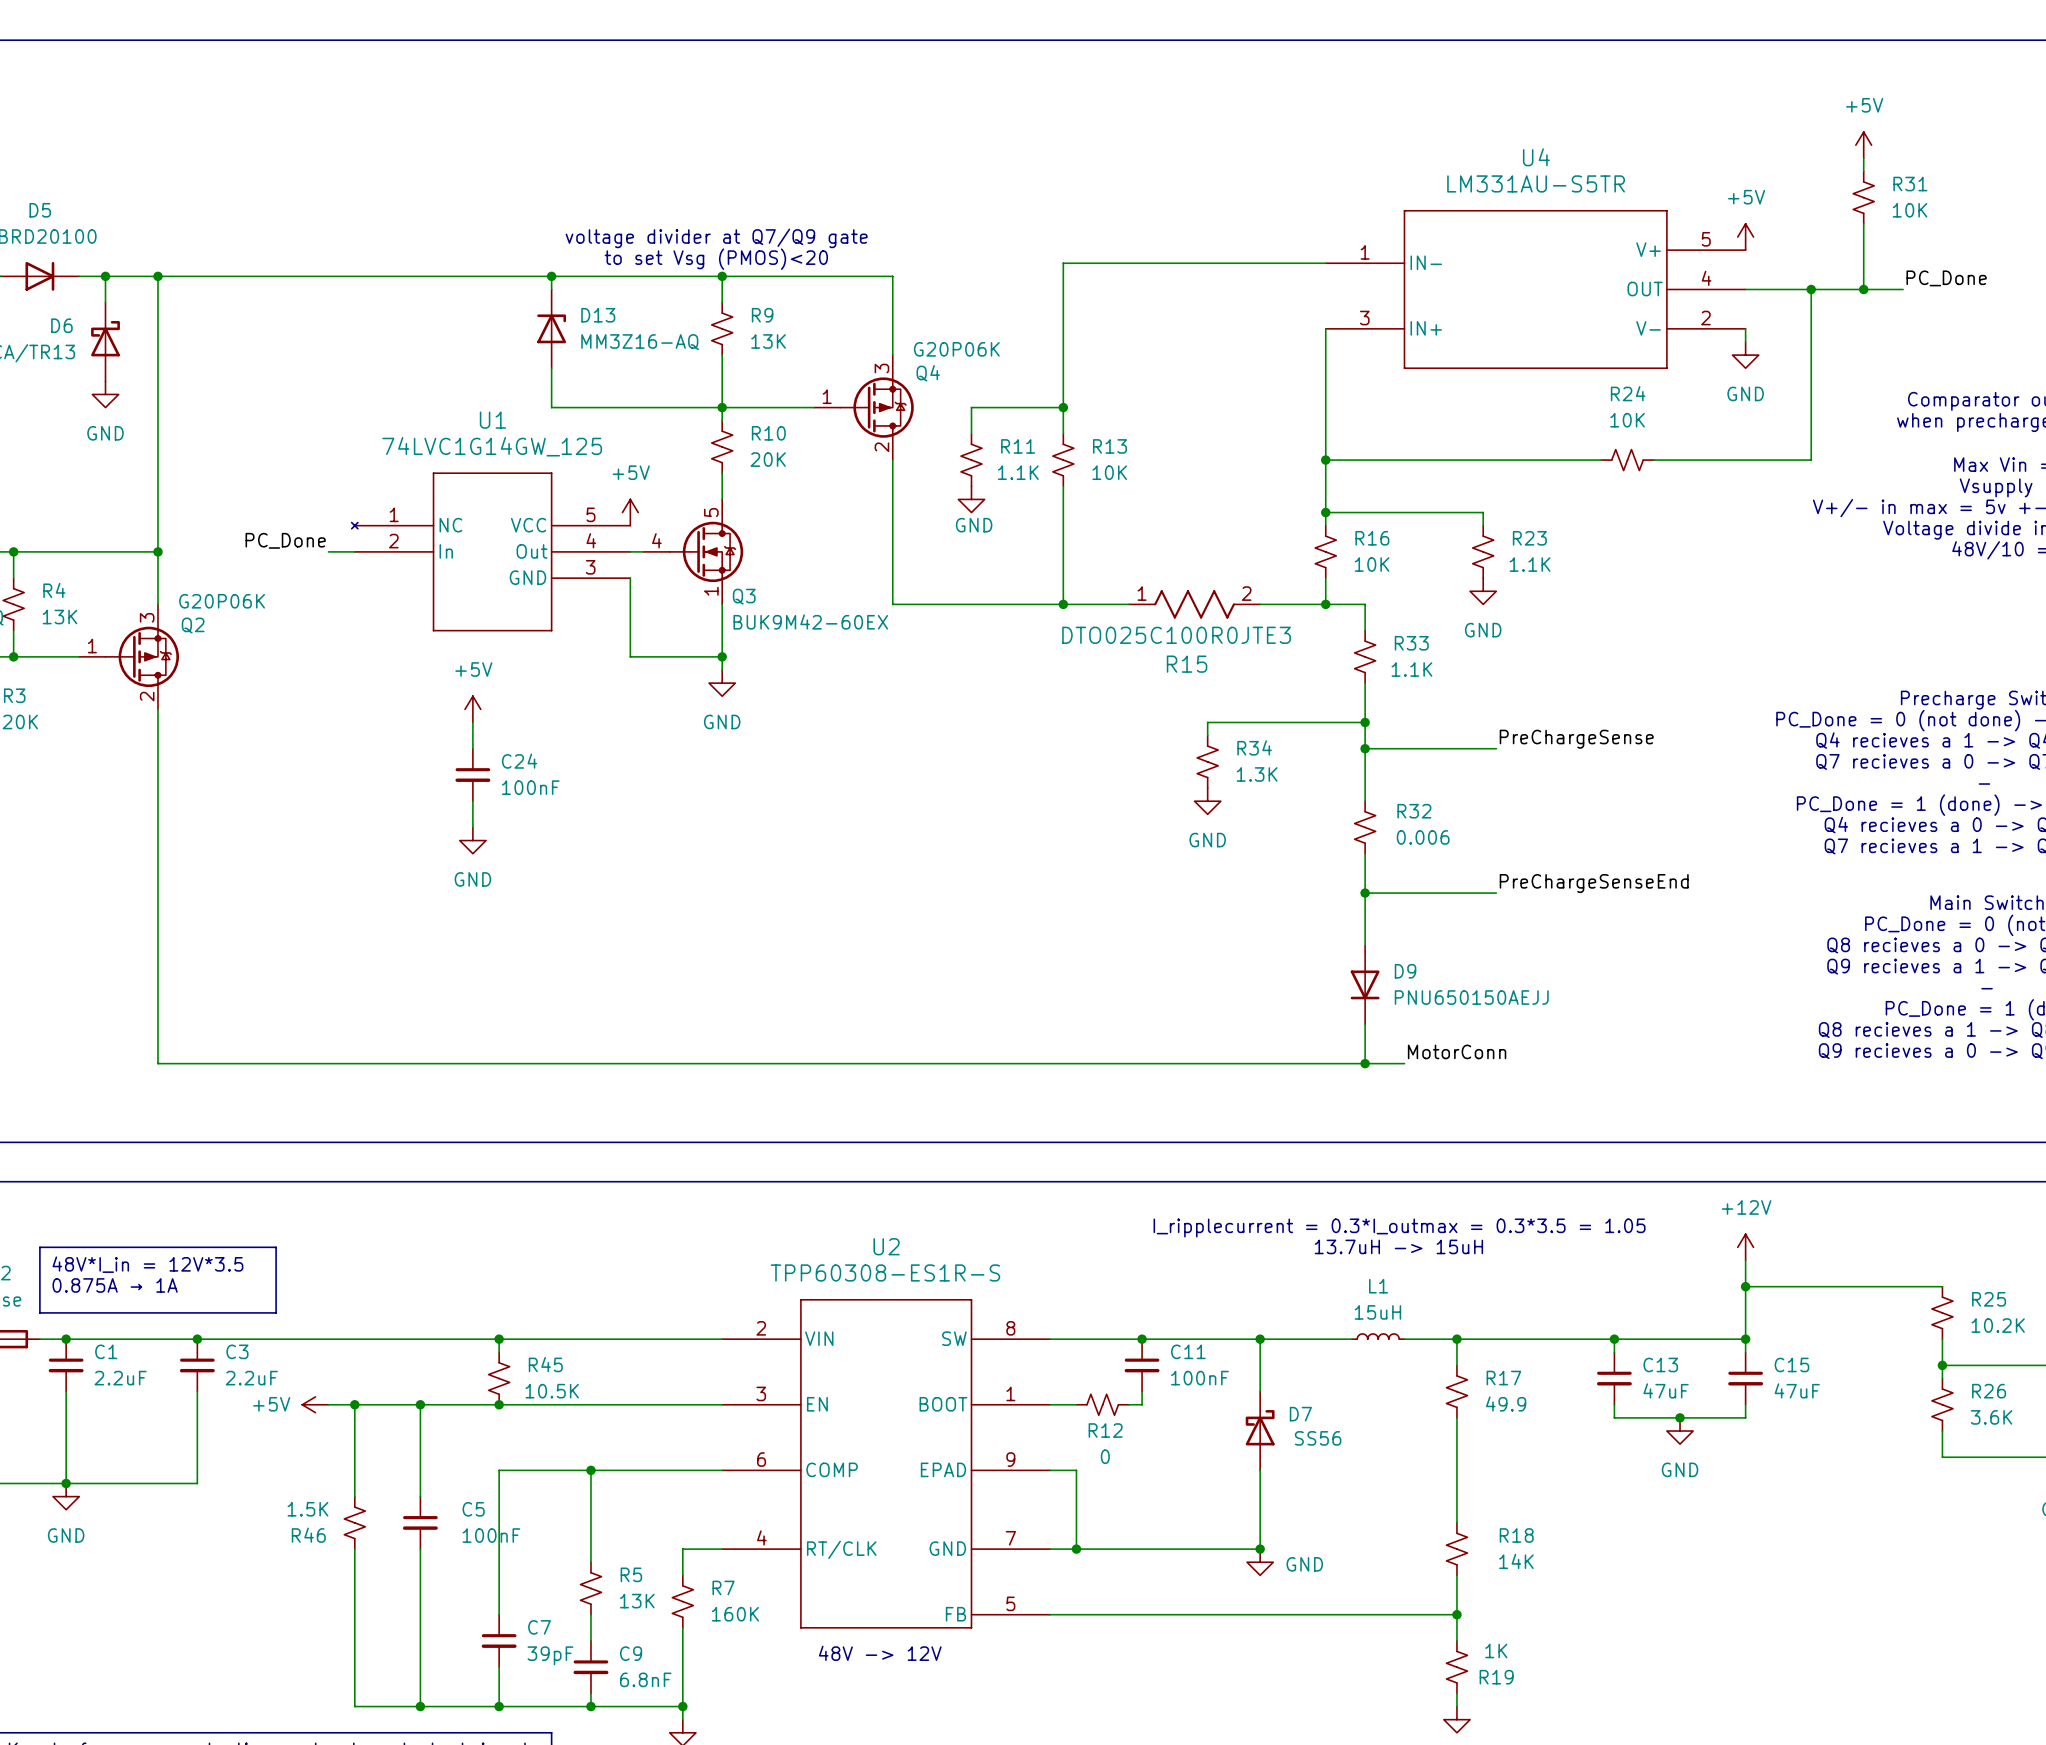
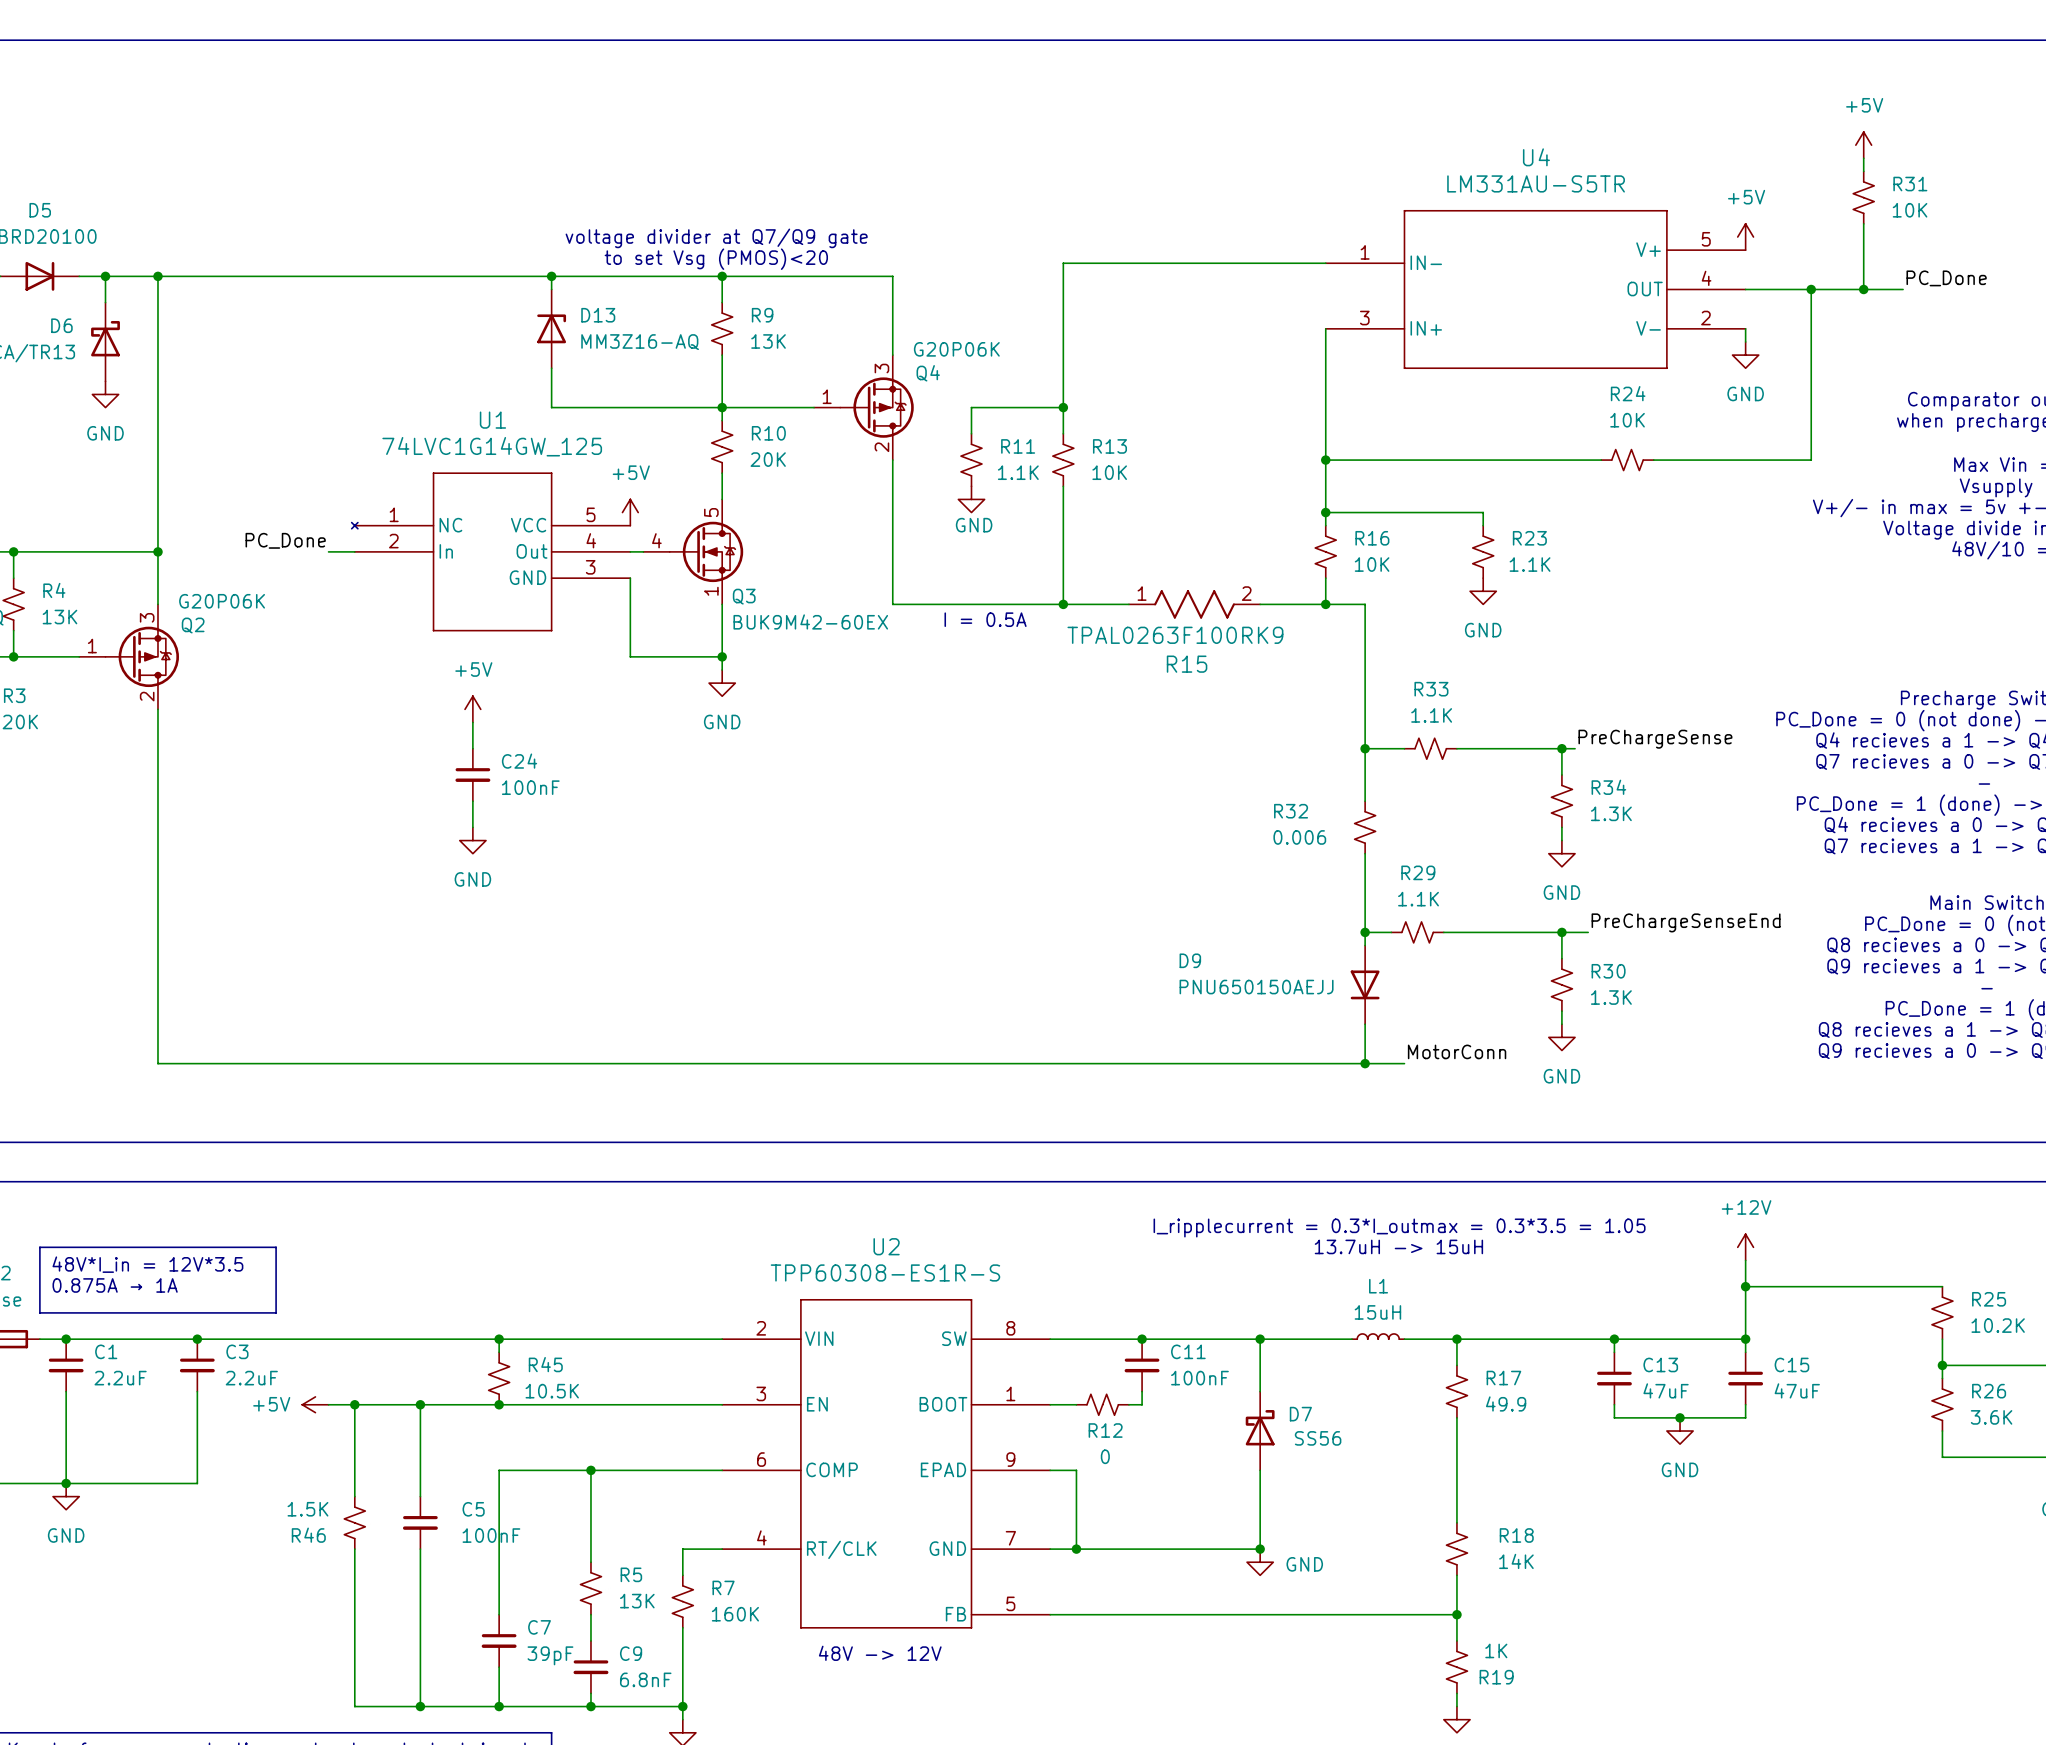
text: none -> I = 0.5A (985, 619)
R15 value: DTO025C100R0JTE3 (1176, 635) -> TPAL0263F100RK9 (1175, 635)
R33 name position: R33 (1411, 643) -> R33 (1431, 689)
R33 rotation: 0° (1365, 656) -> 90° clockwise (1430, 748)
R33 position: (1365, 656) -> (1430, 748)
R33 value position: 1.1K (1411, 669) -> 1.1K (1431, 715)
wire: (1365, 722) (1207, 722) (1207, 735) -> none
junction: (1365, 722) -> none
label position: PreChargeSense (1576, 739) -> PreChargeSense (1655, 739)
wire: none -> (1496, 748) (1575, 748)
wire: none -> (1561, 748) (1561, 774)
junction: none -> (1561, 748)
R34 position: (1207, 761) -> (1561, 801)
power symbol: GND (1207, 801) -> none
R32 name position: R32 (1414, 811) -> R32 (1291, 811)
wire: none -> (1561, 827) (1561, 840)
R32 value position: 0.006 (1423, 837) -> 0.006 (1299, 837)
power symbol: none -> GND (1561, 853)
label position: PreChargeSenseEnd (1594, 883) -> PreChargeSenseEnd (1686, 922)
wire: (1365, 893) (1496, 893) -> none
junction position: (1365, 893) -> (1365, 932)
wire: none -> (1365, 932) (1391, 932)
R29: none -> 1.1K (1417, 932)
wire: none -> (1443, 932) (1588, 932)
wire: none -> (1561, 932) (1561, 958)
junction: none -> (1561, 932)
D9 name position: D9 (1405, 971) -> D9 (1190, 960)
R30: none -> 1.3K (1561, 984)
D9 value position: PNU650150AEJJ (1471, 997) -> PNU650150AEJJ (1256, 987)
wire: none -> (1561, 1011) (1561, 1024)
power symbol: none -> GND (1561, 1037)

